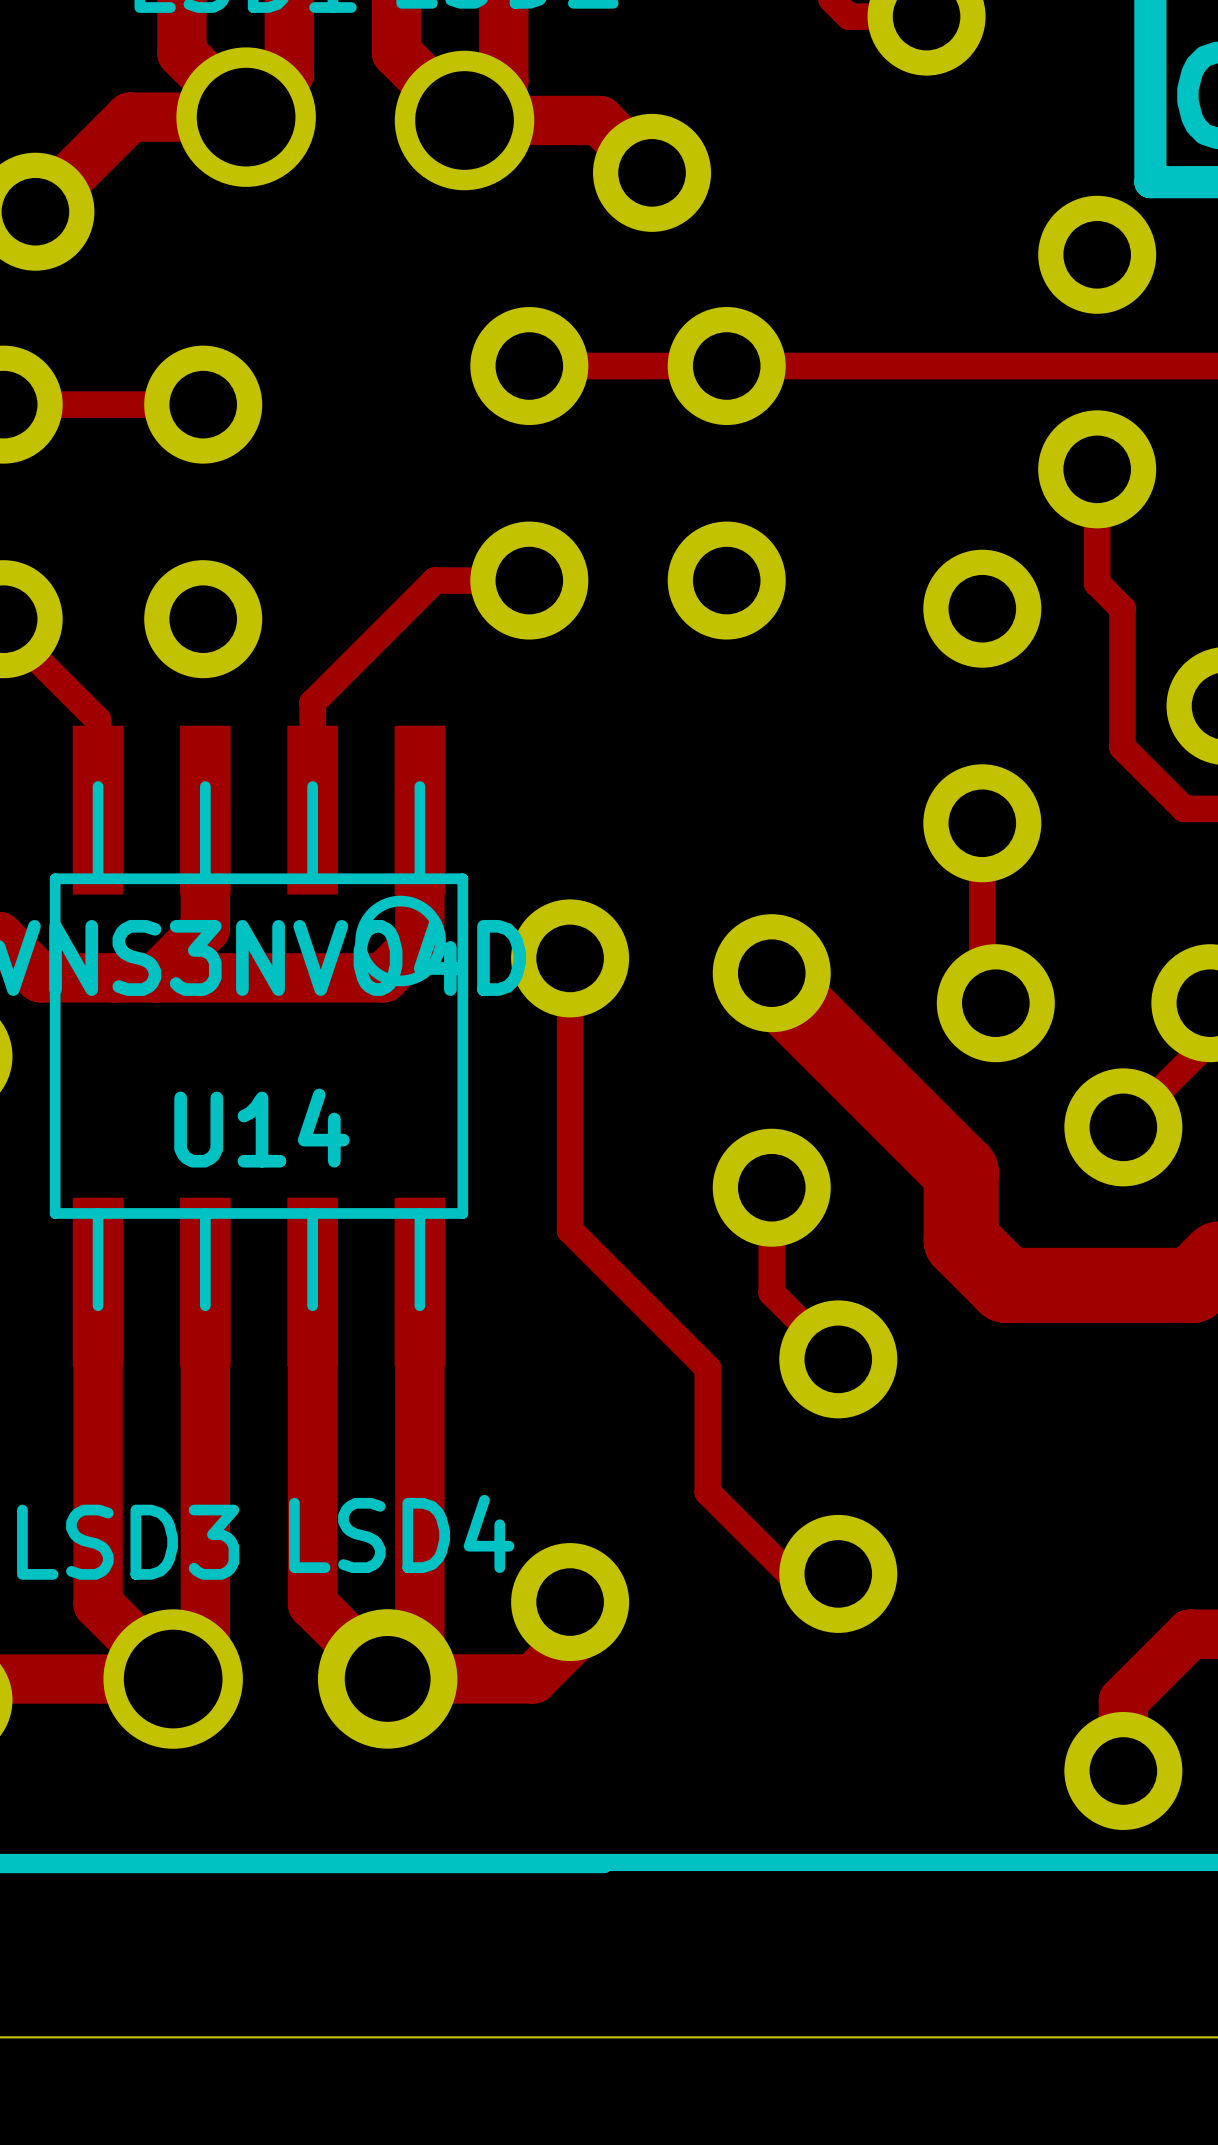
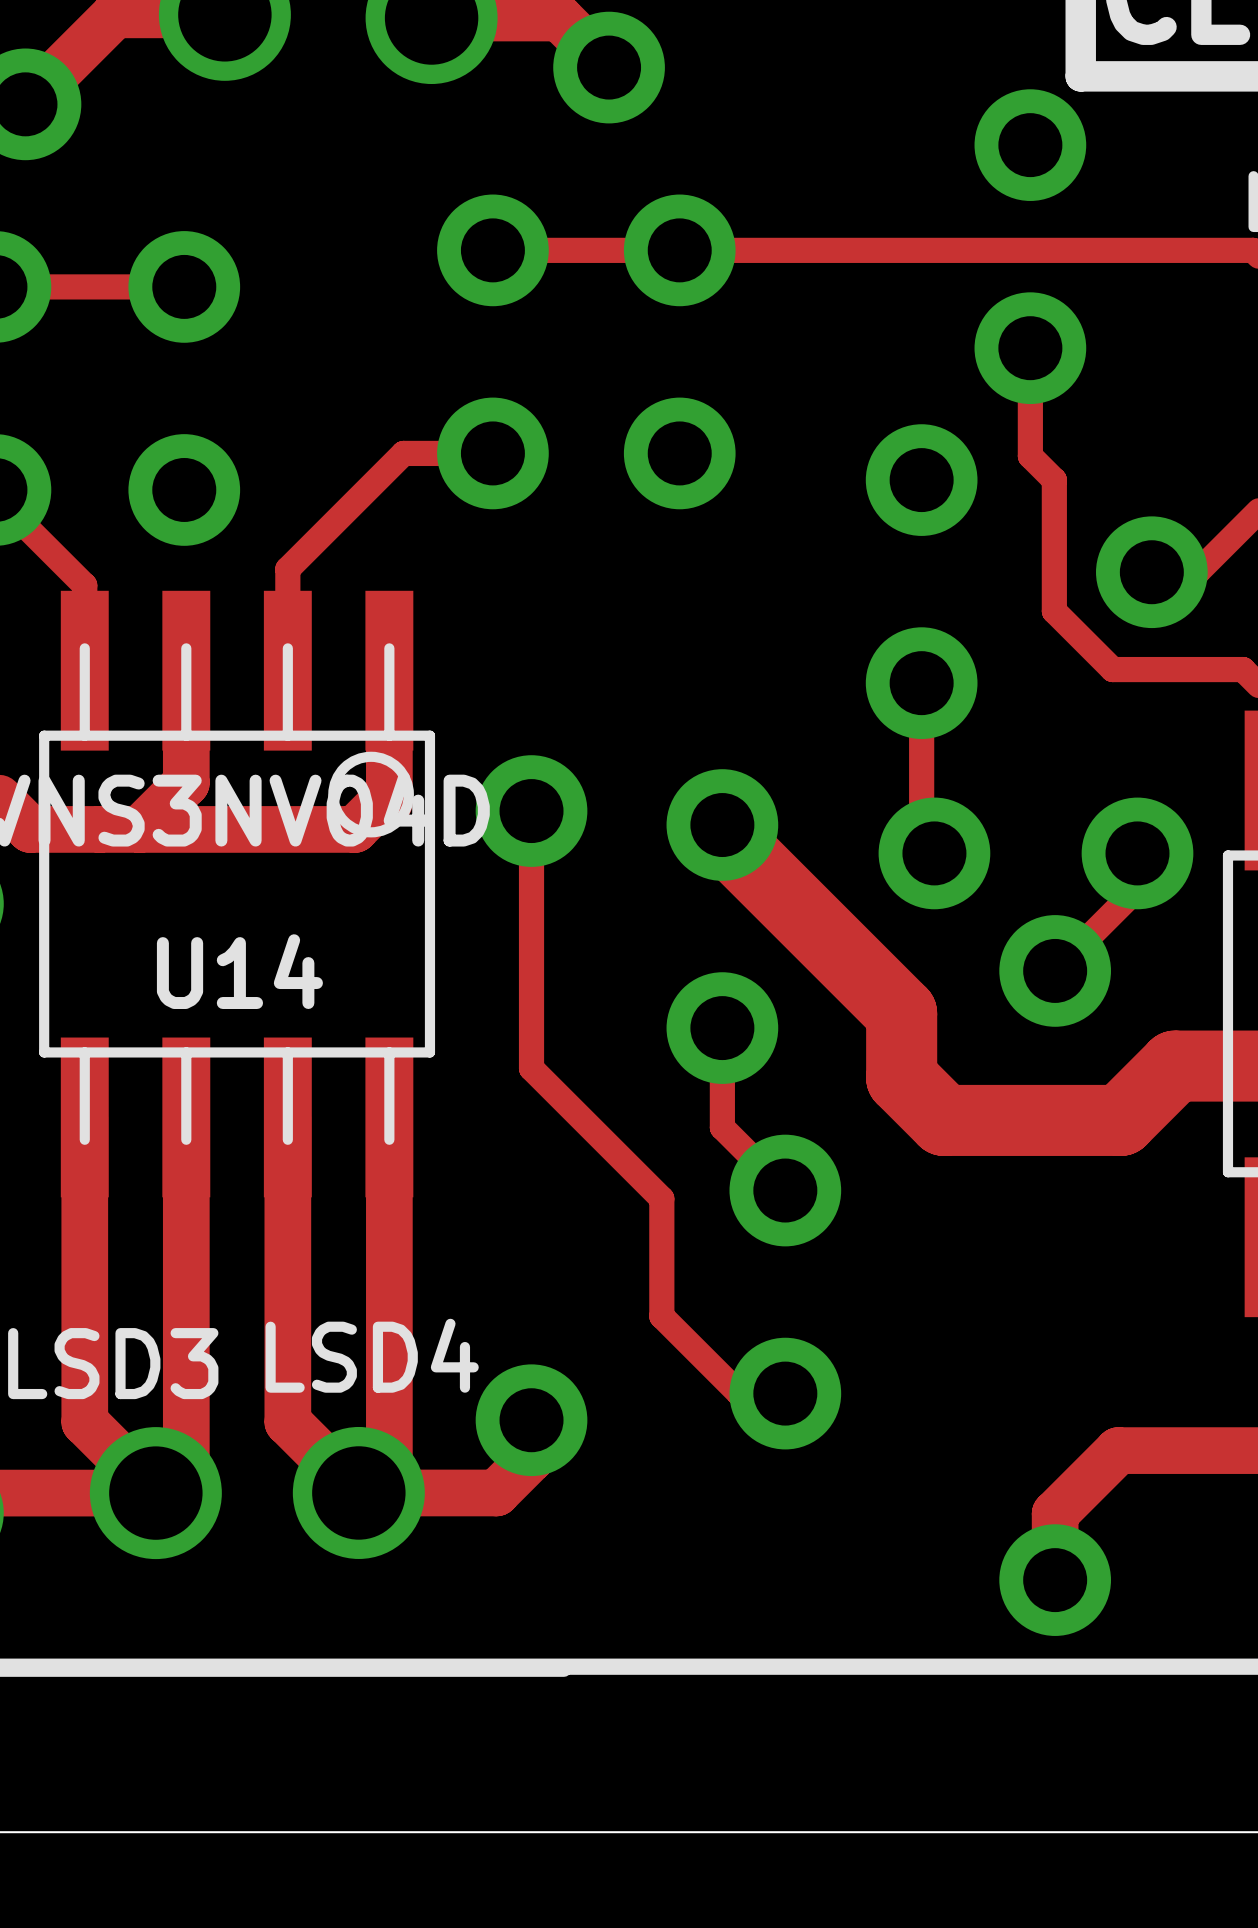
part footprint: [317, 1609, 458, 1749] -> [292, 1426, 425, 1559]

